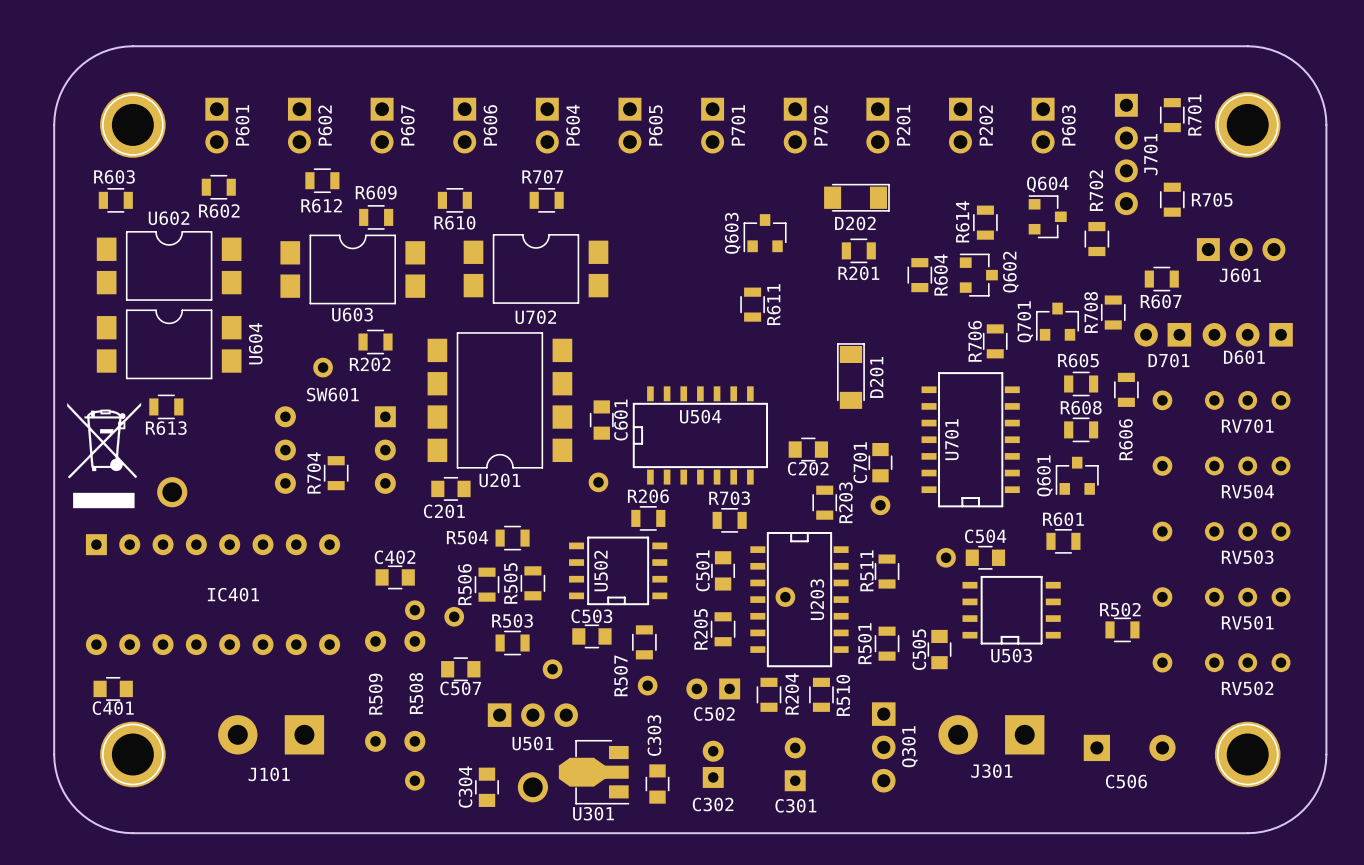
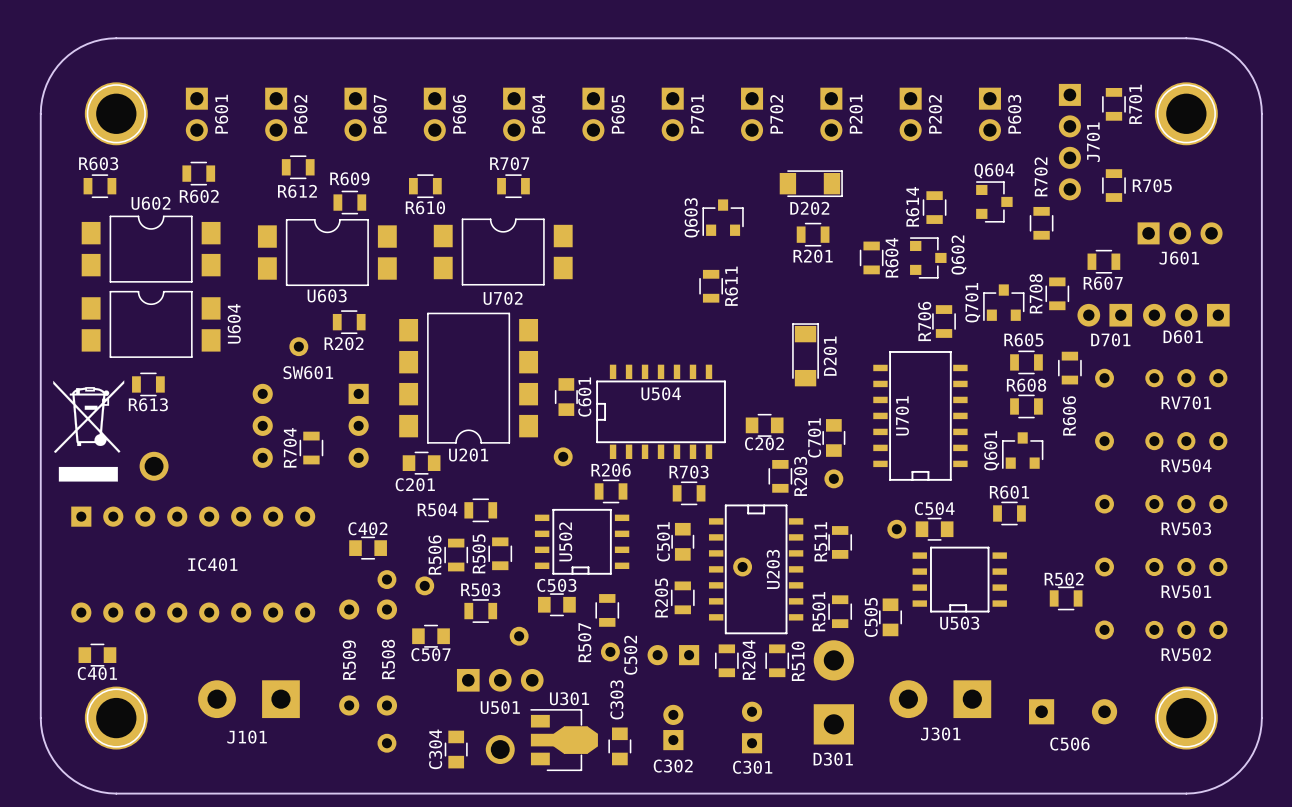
C502 name rotation: 0° (714, 714) -> 90° counterclockwise (630, 655)
D301: none -> (833, 692)
Q301: (883, 747) -> none
U301 rotation: 0° (594, 772) -> 180° (564, 740)

